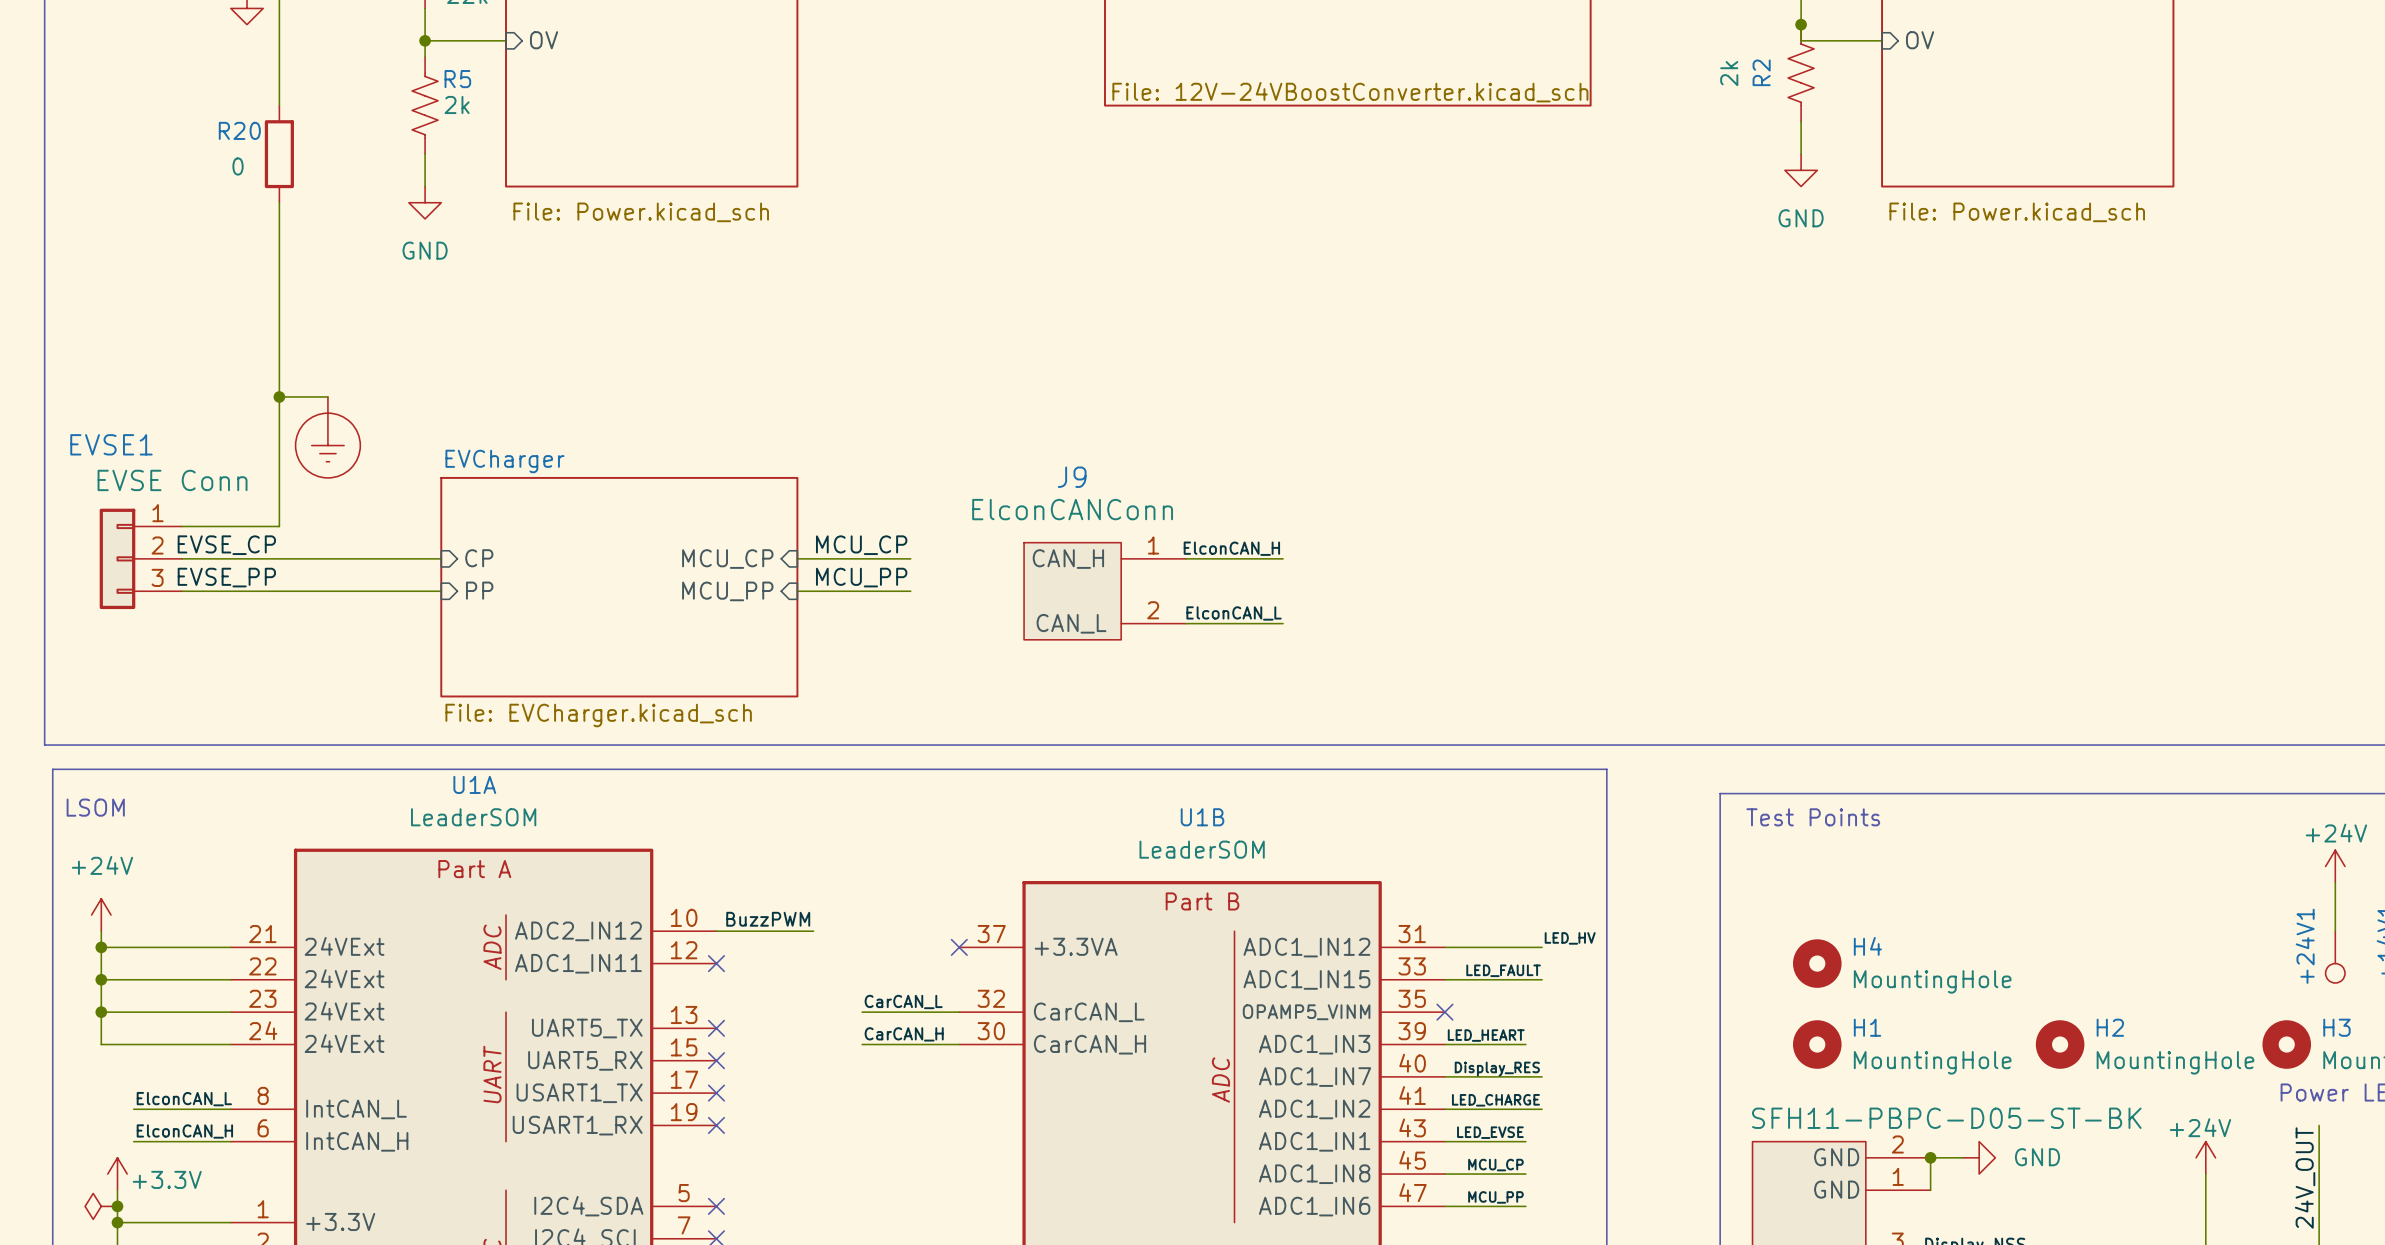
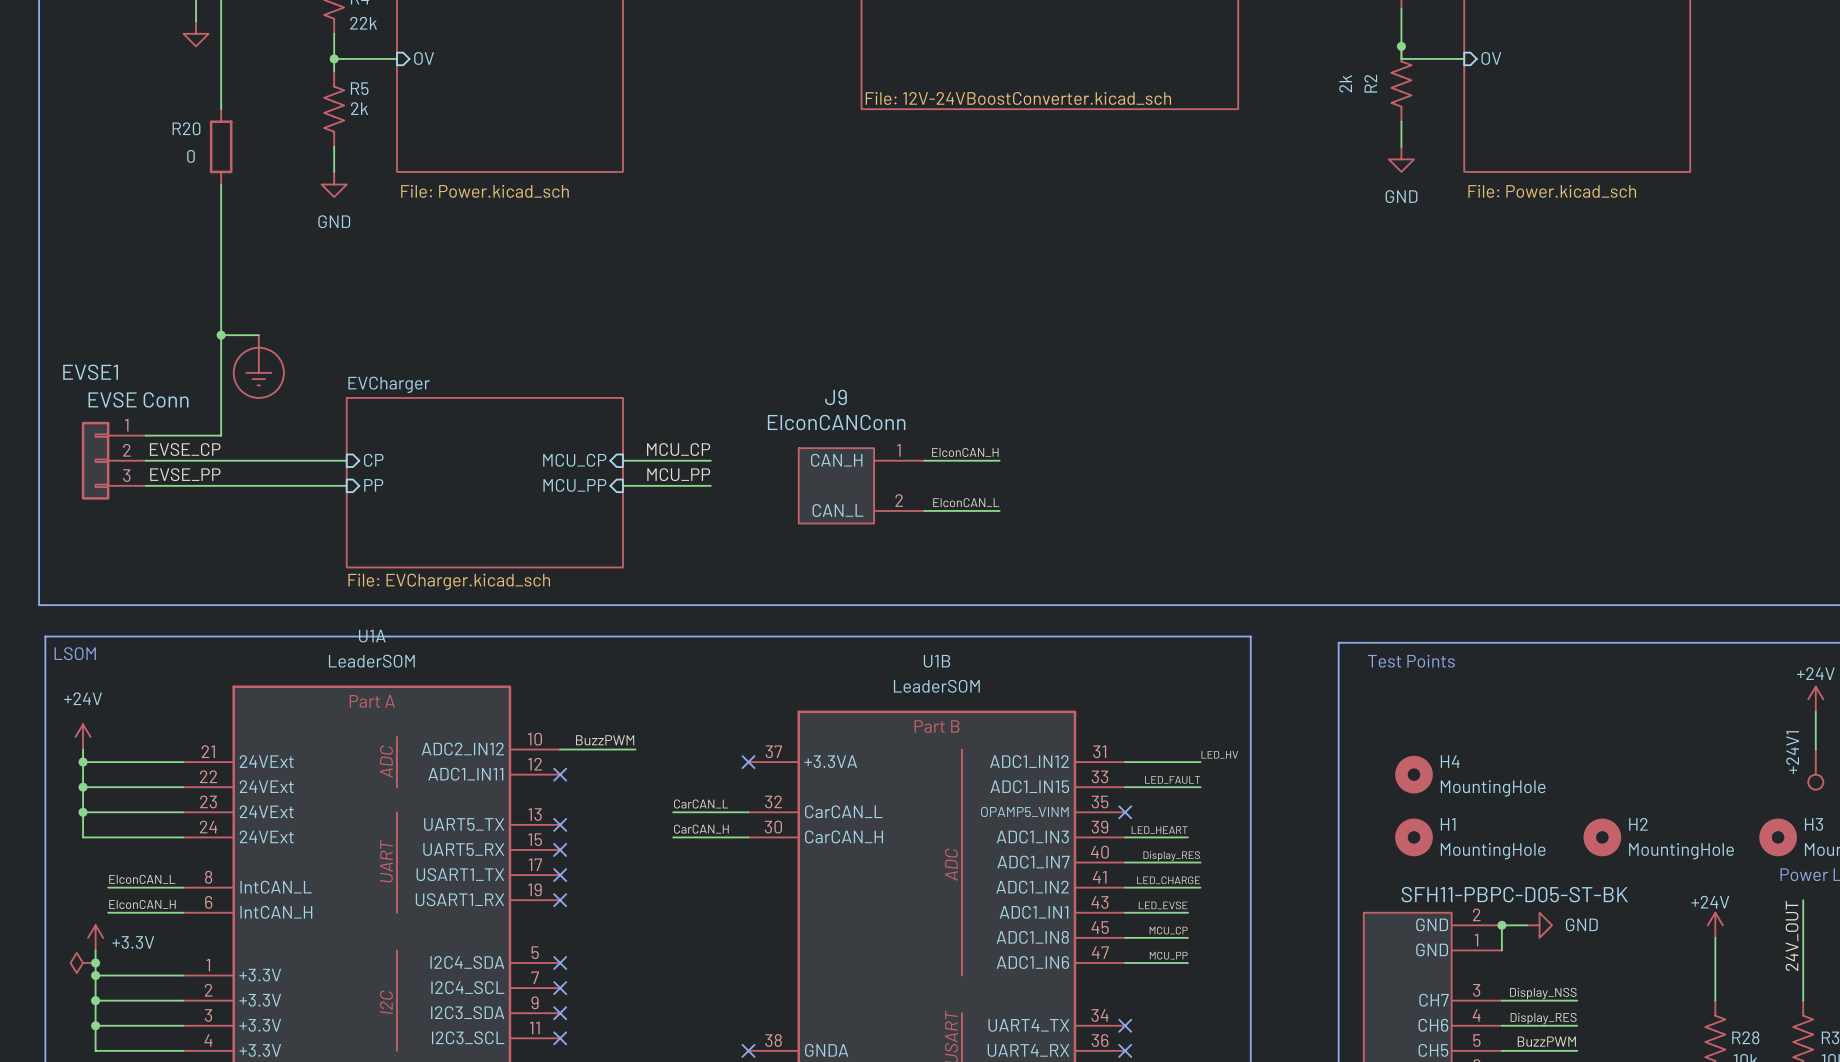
line: (52, 785) (52, 769) (1606, 769) (1606, 785) -> (45, 636) (1250, 636)

